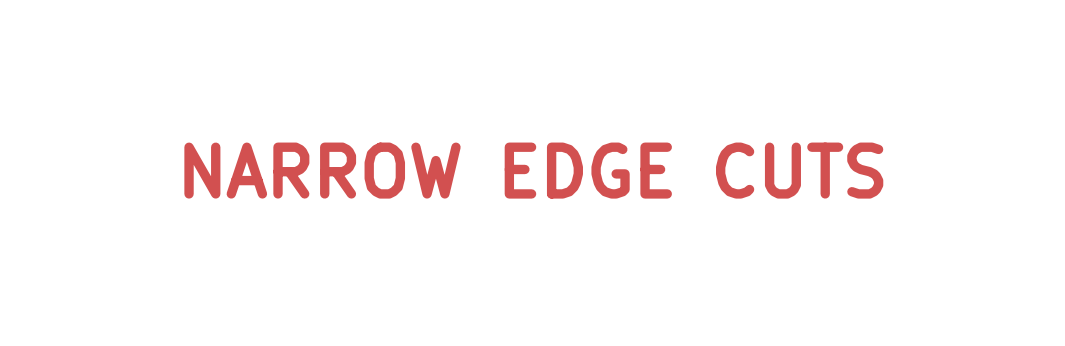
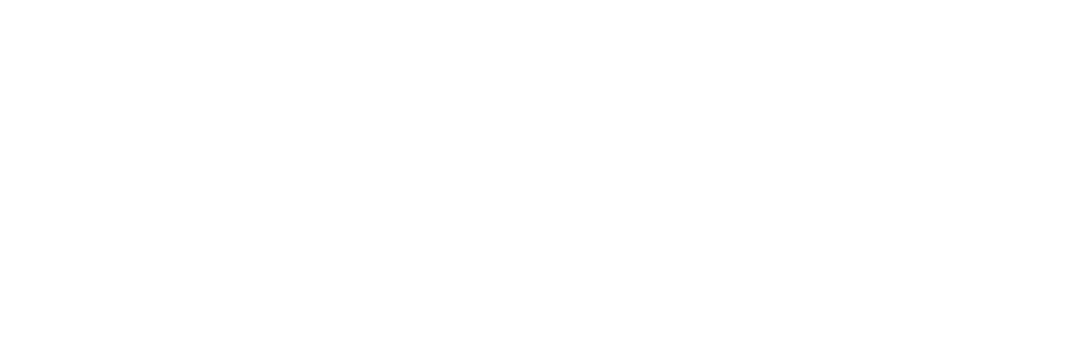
text: NARROW EDGE CUTS (533, 170) -> none

